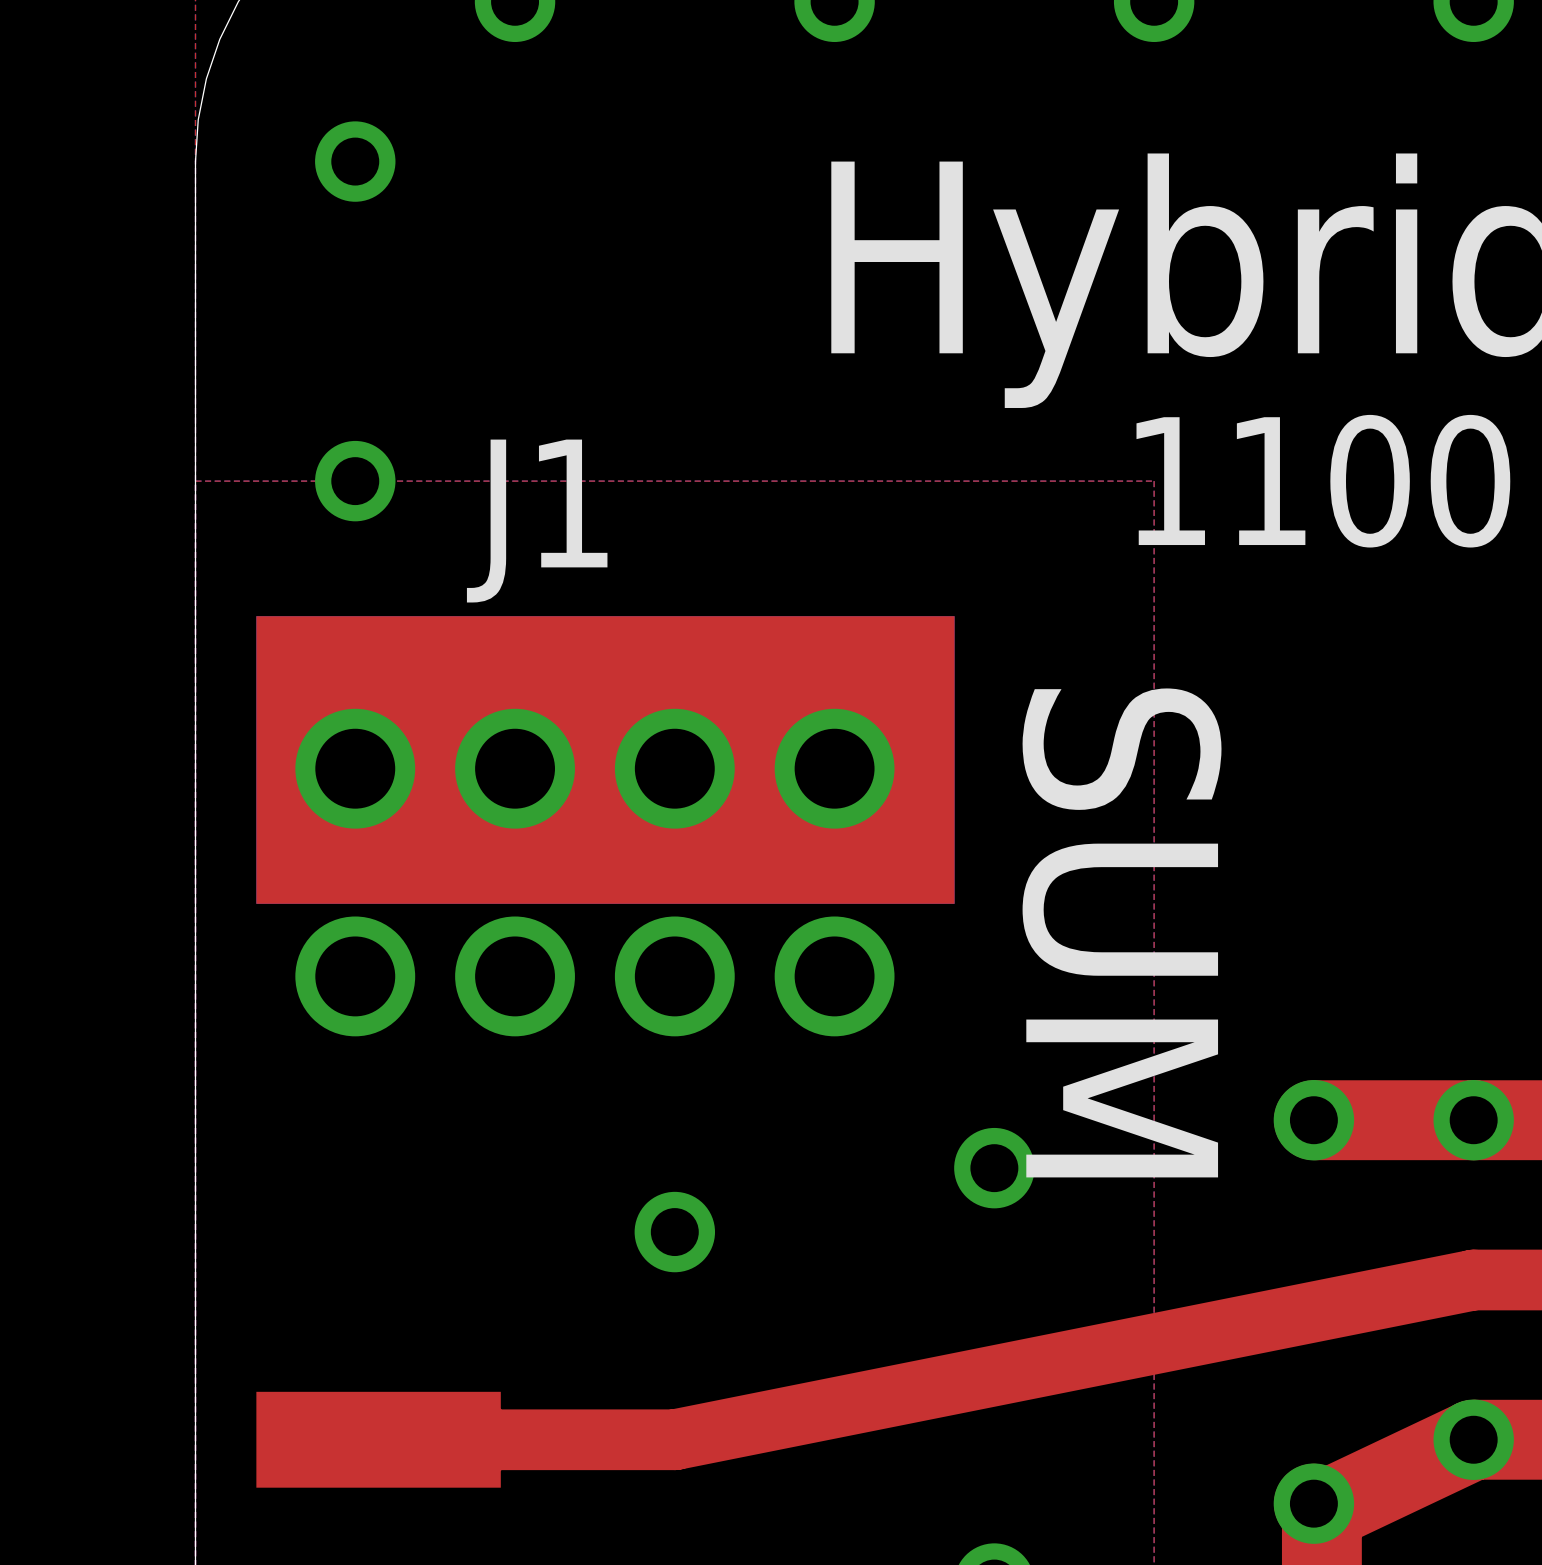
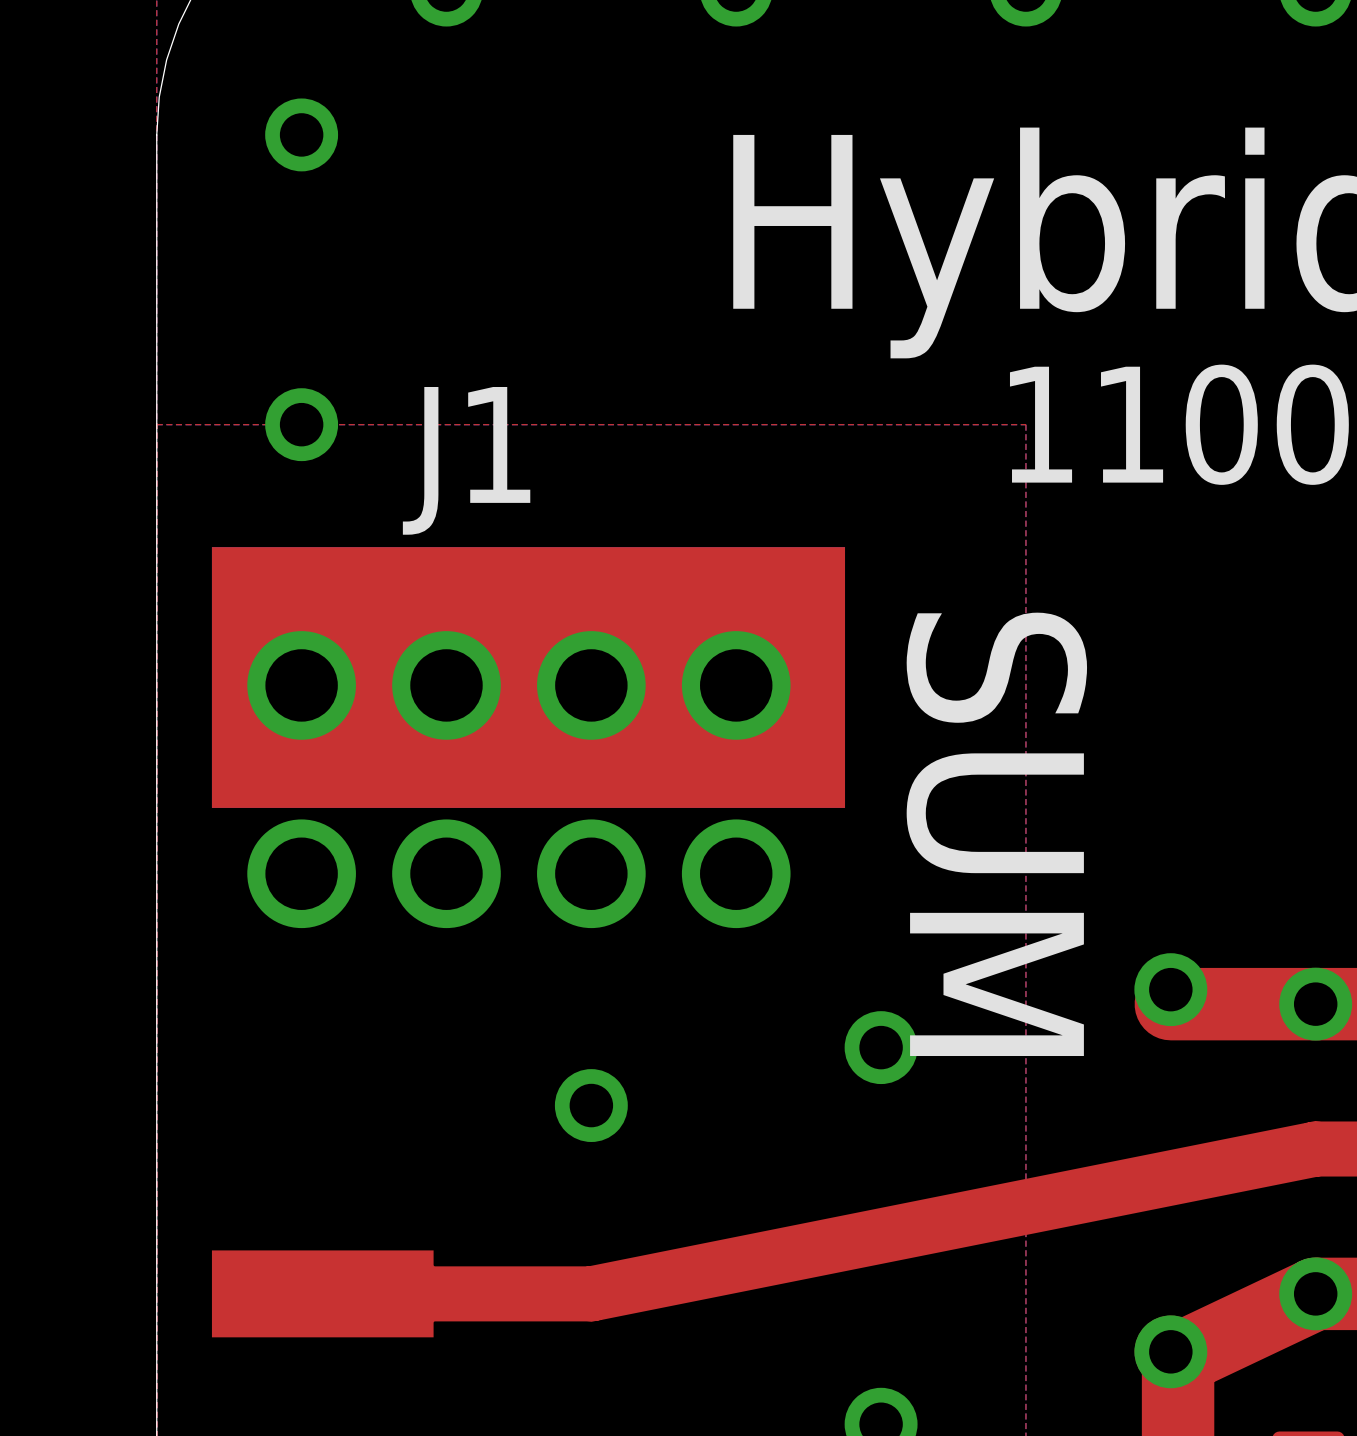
via position: (1313, 1120) -> (1170, 989)

